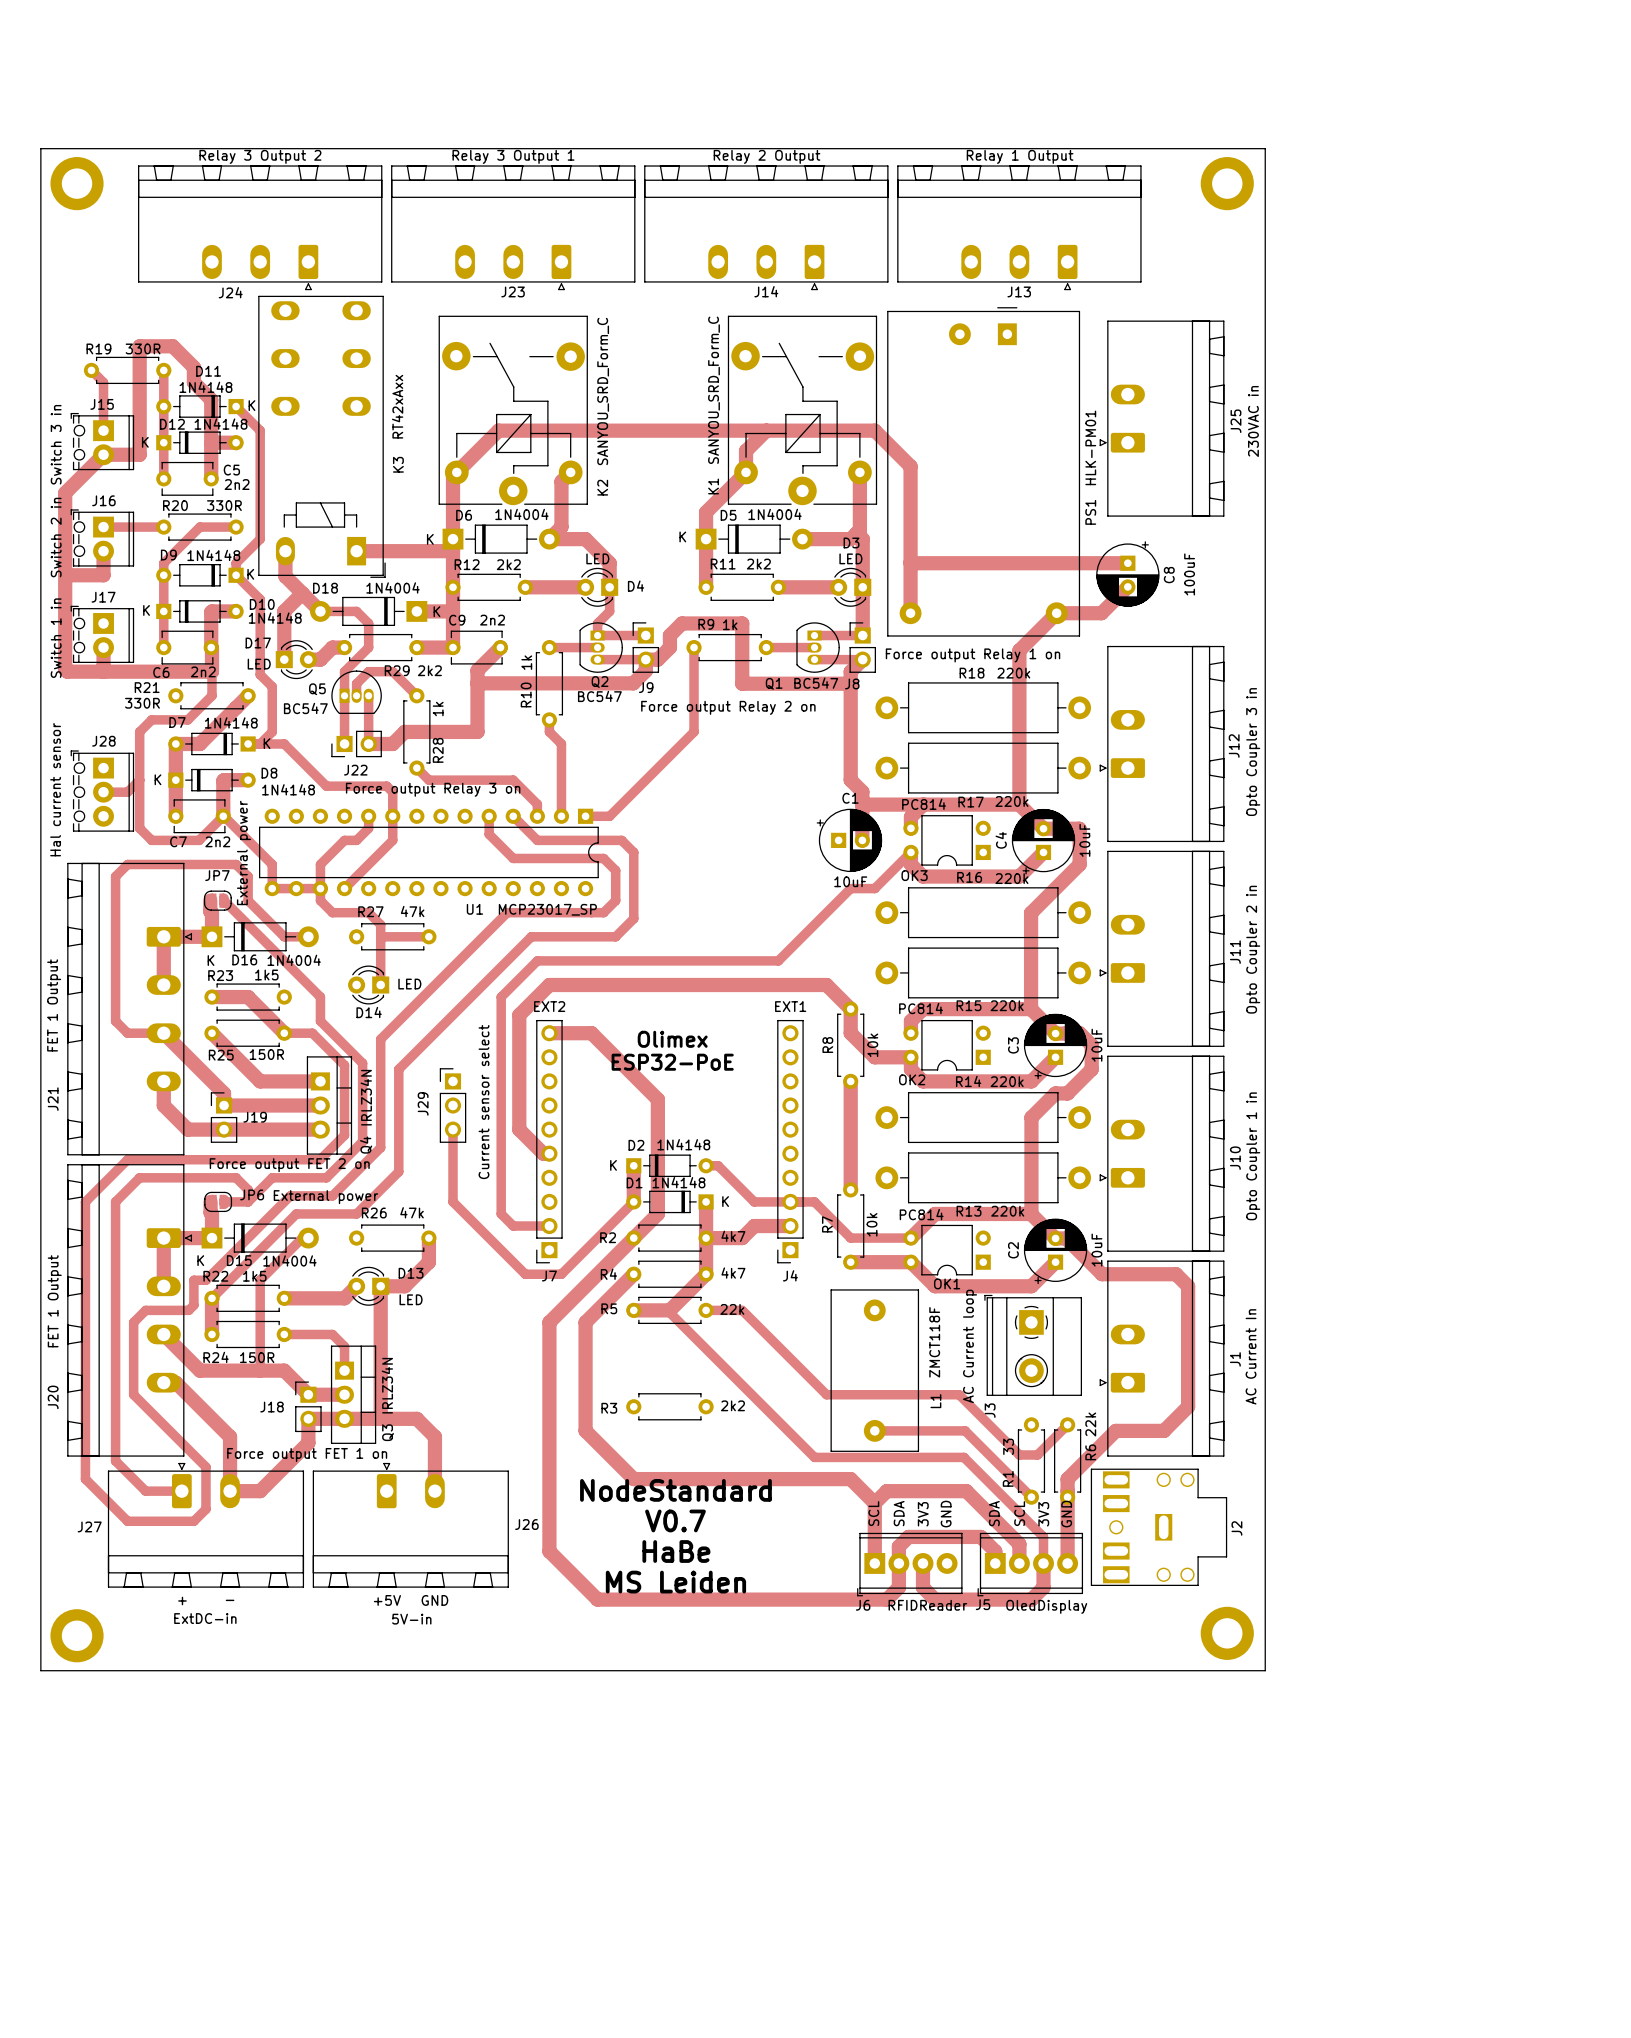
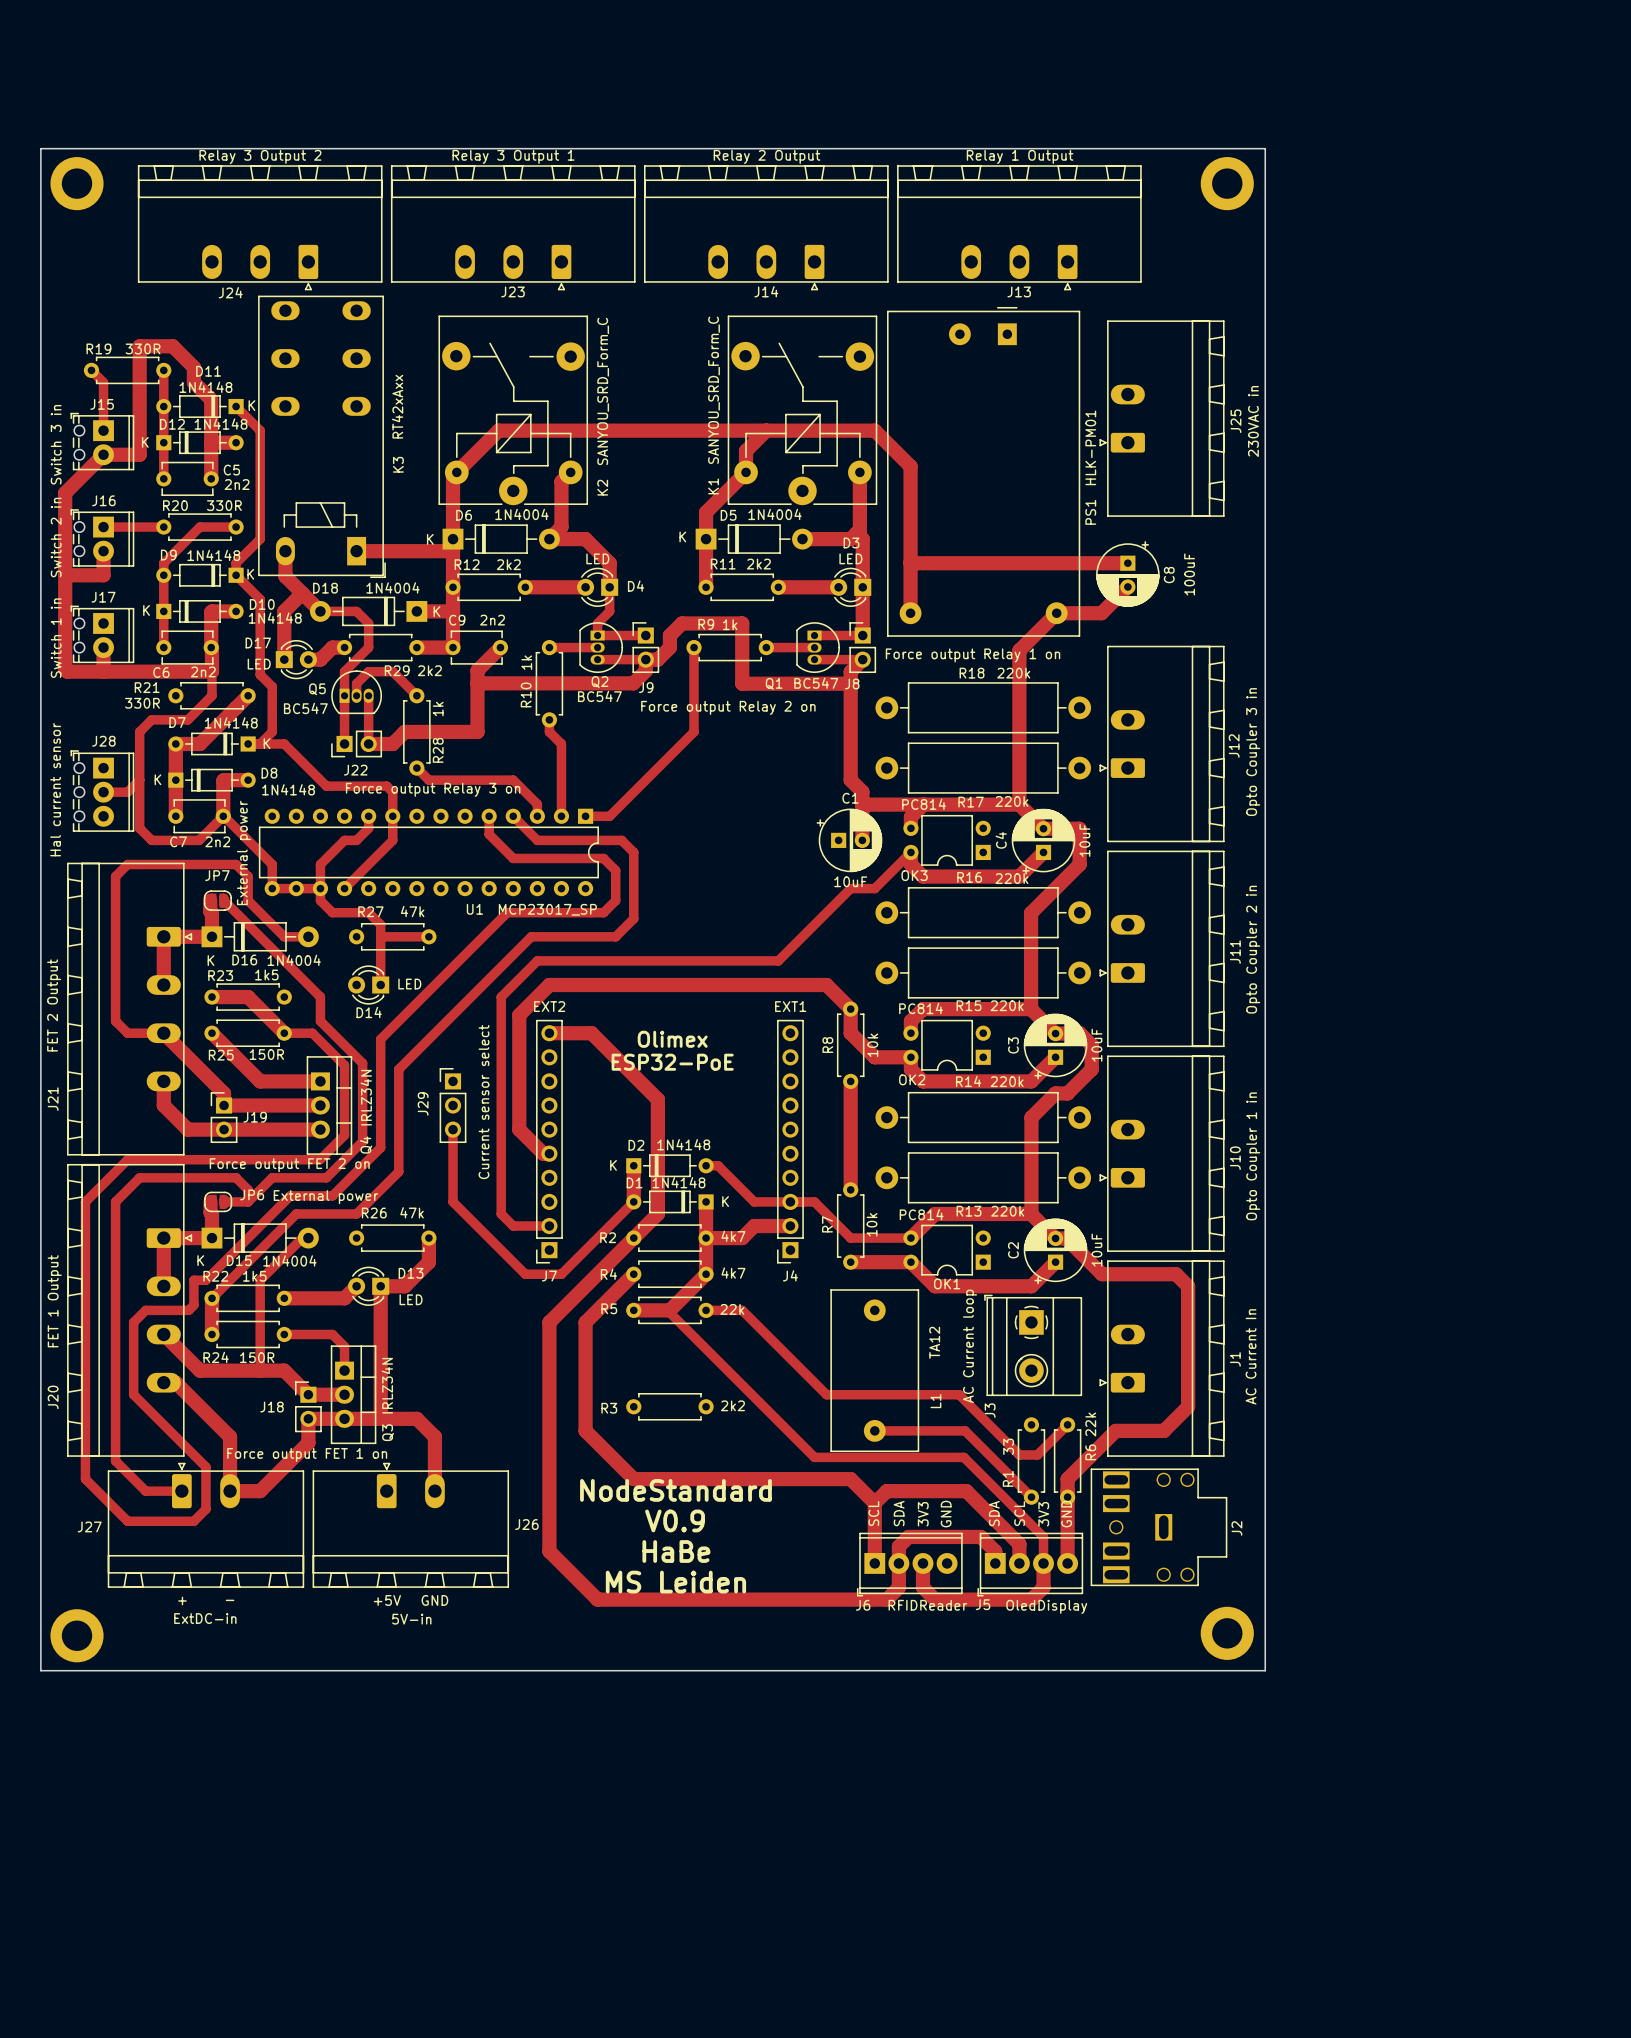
J21 value: FET 1 Output (54, 1005) -> FET 2 Output (54, 1005)
L1 value: ZMCT118F (934, 1342) -> TA12 (934, 1342)
text: V0.7 (675, 1520) -> V0.9 (675, 1520)

